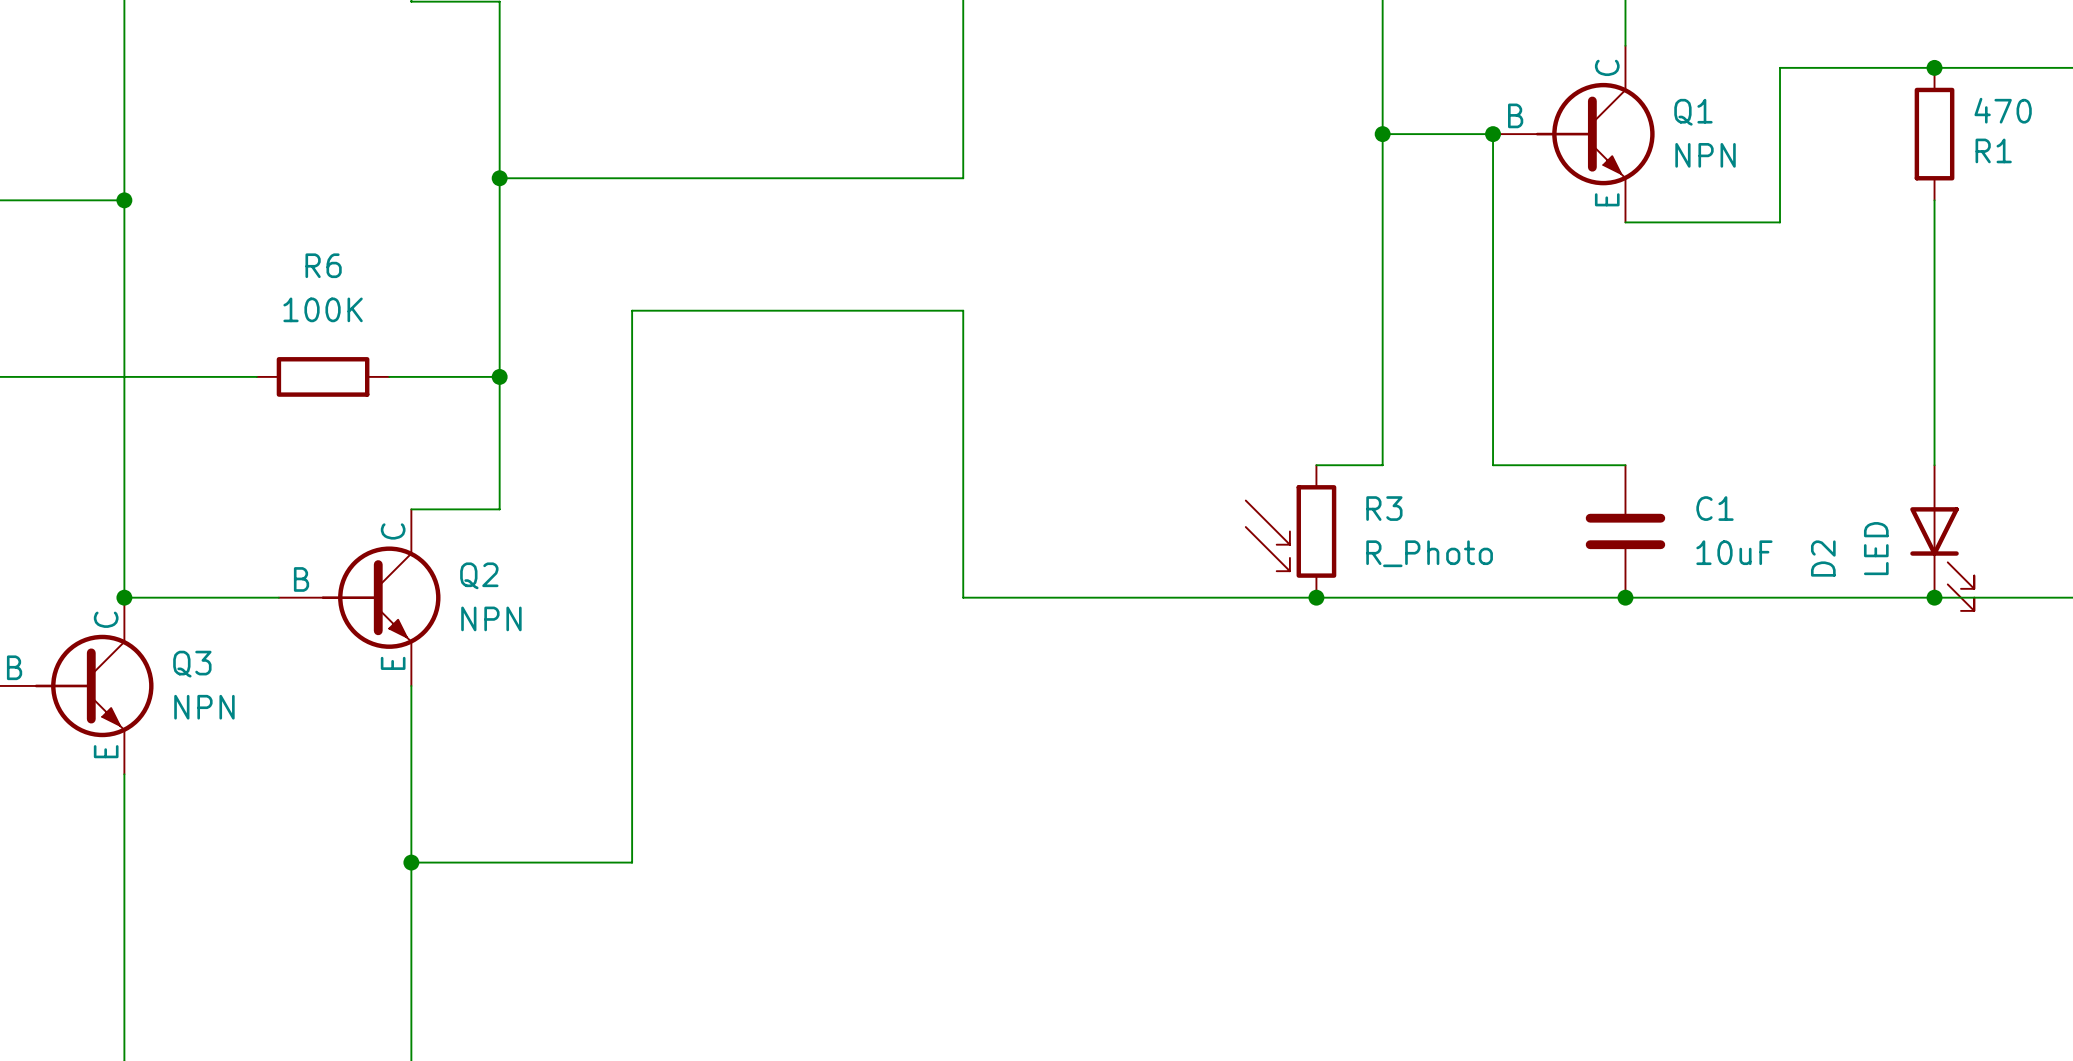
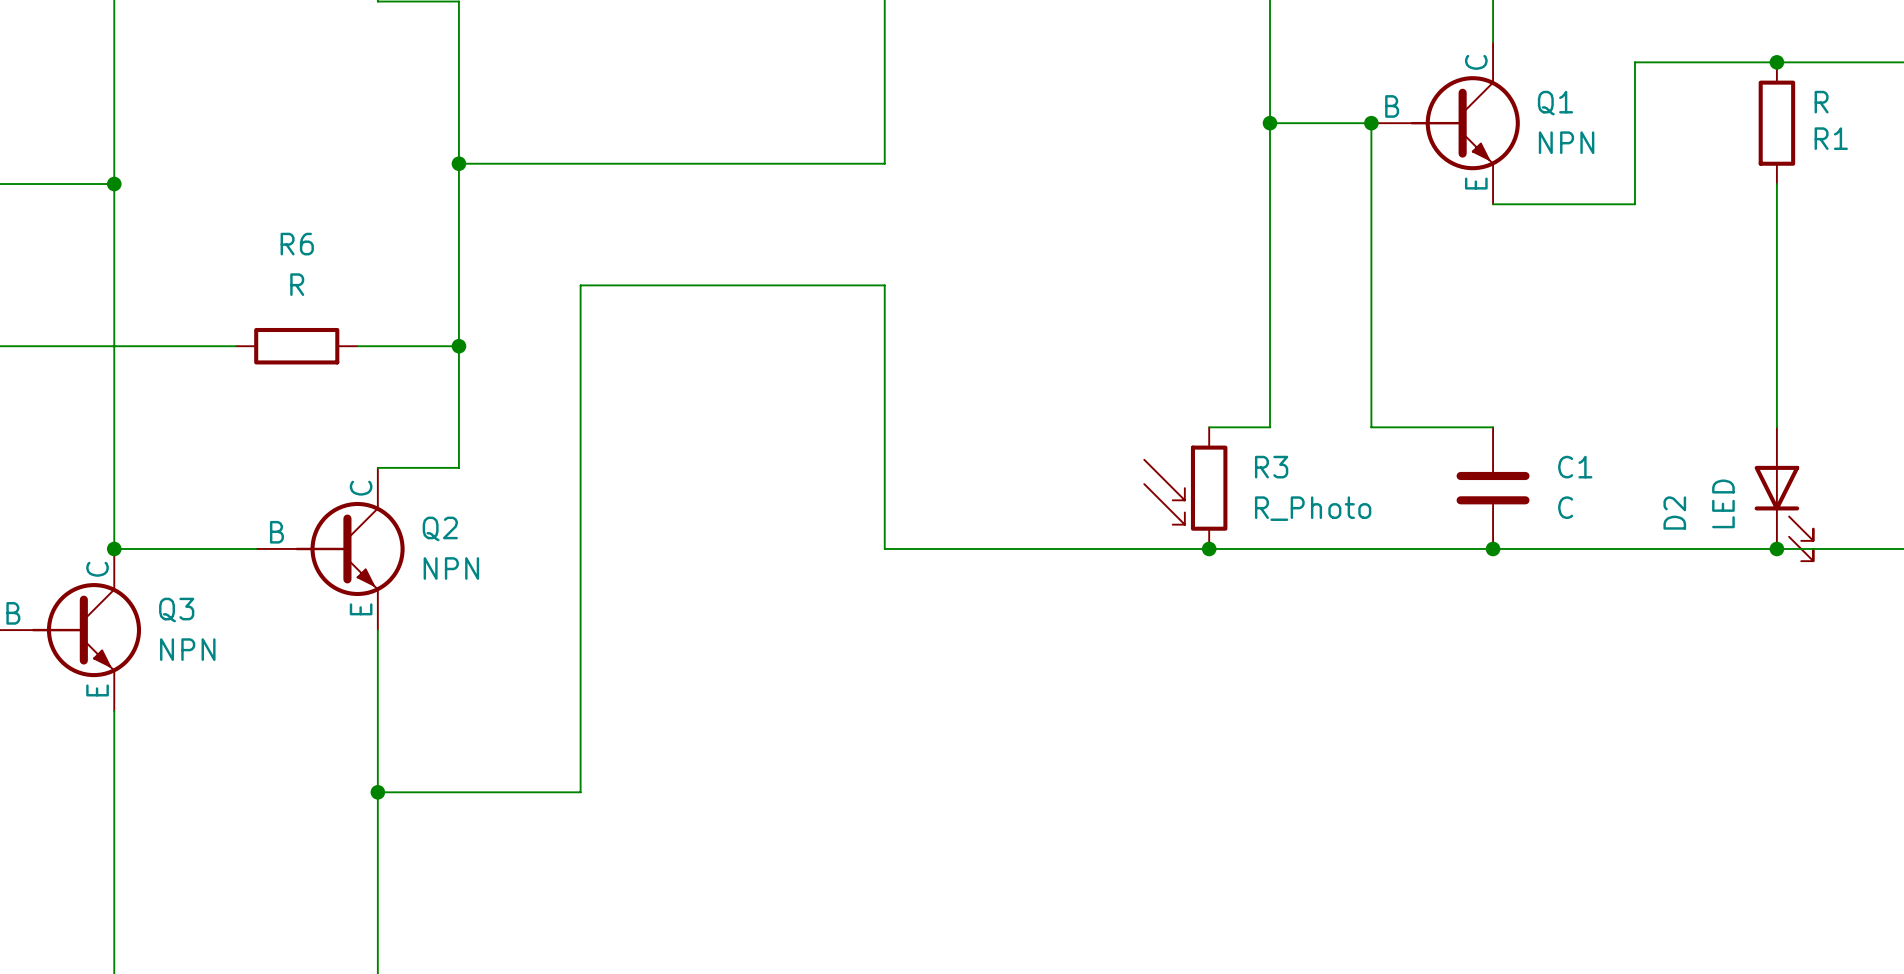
R1 value: 470 (2003, 110) -> R (1821, 102)
R6 value: 100K (323, 309) -> R (297, 284)
C1 value: 10uF (1734, 552) -> C (1565, 507)

